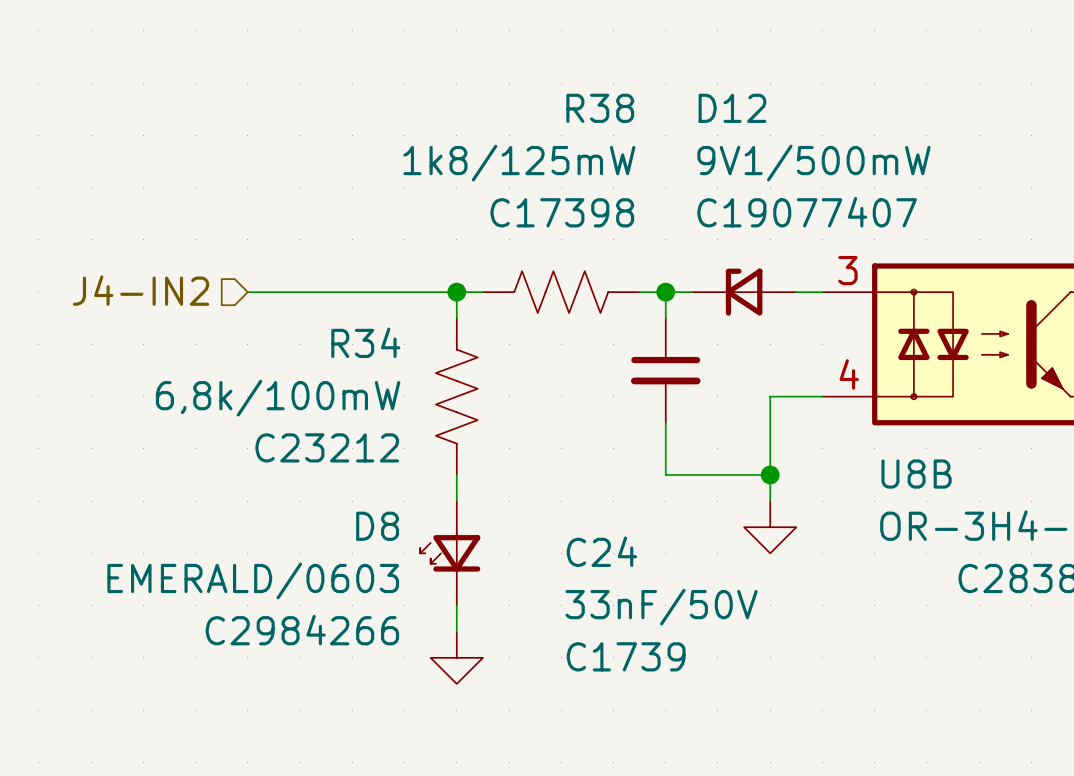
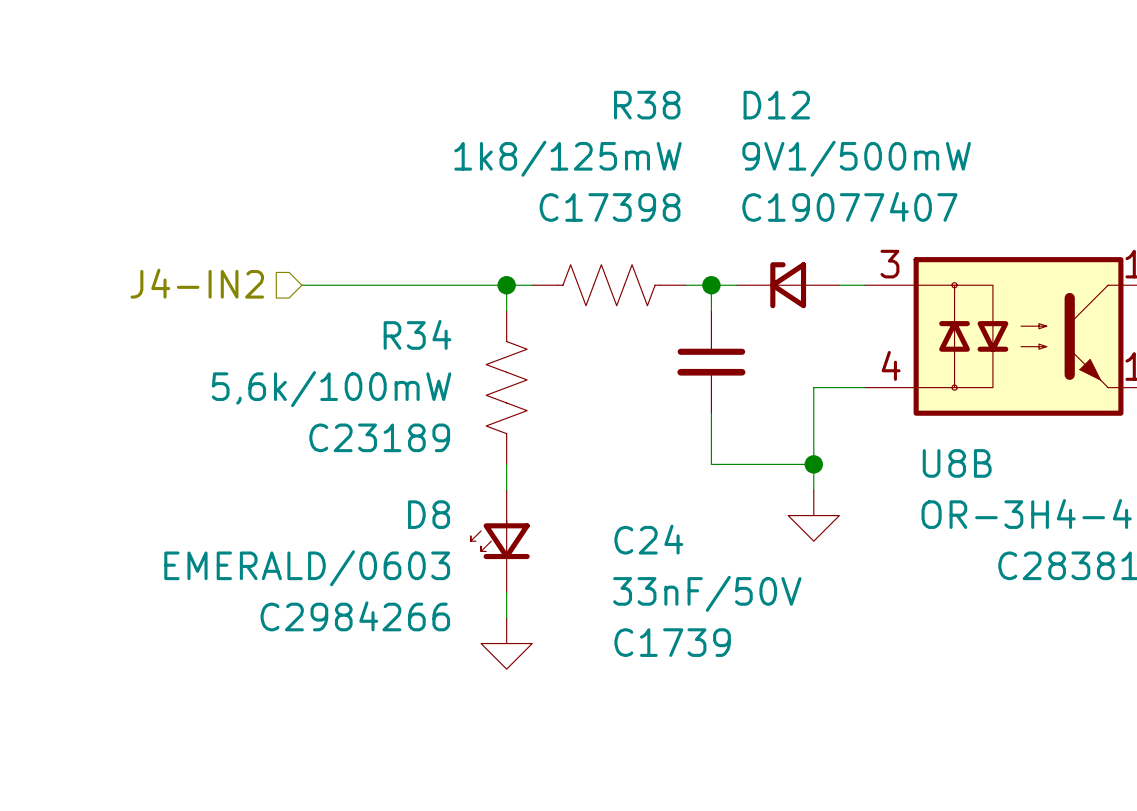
R34 value: 6,8k/100mW (278, 398) -> 5,6k/100mW (331, 389)
R34 text: C23212 (327, 447) -> C23189 (379, 437)

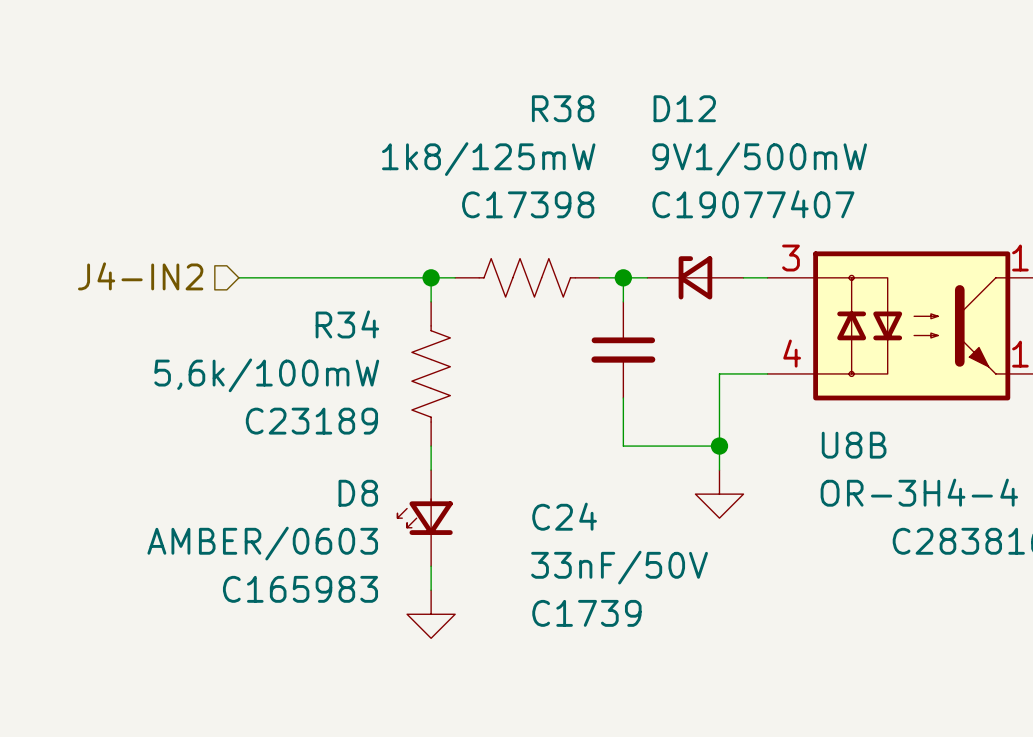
D8 value: EMERALD/0603 (307, 568) -> AMBER/0603 (262, 543)
D8 text: C2984266 (355, 616) -> C165983 (300, 589)

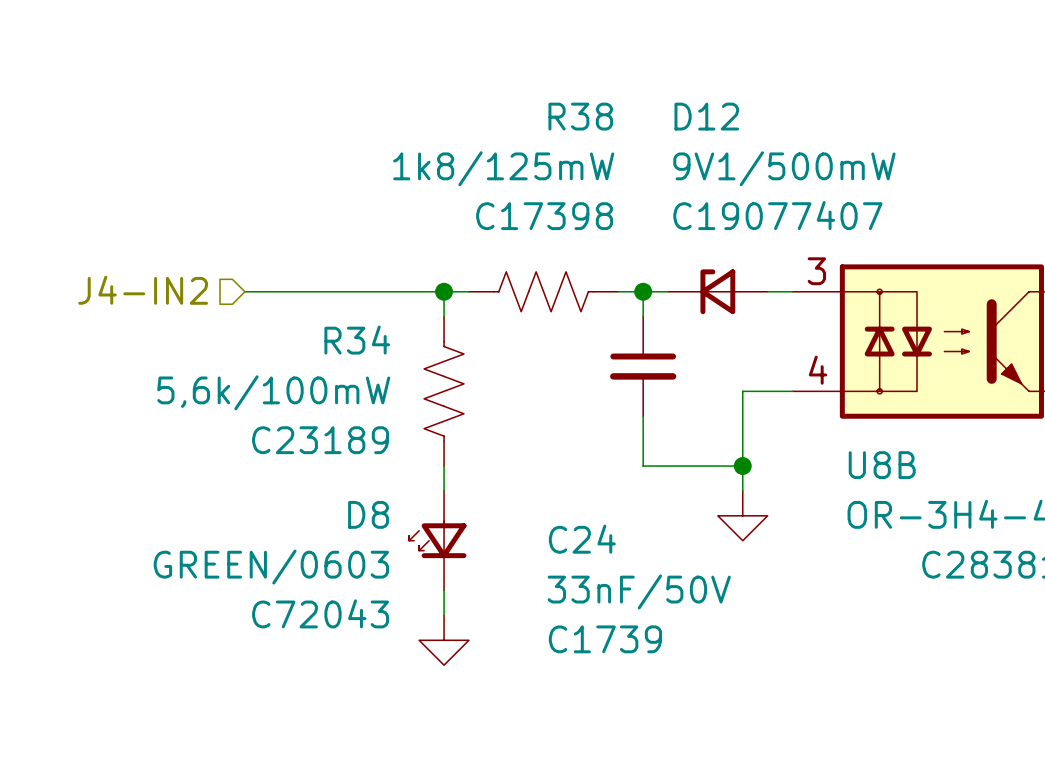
D8 value: AMBER/0603 (262, 543) -> GREEN/0603 (271, 567)
D8 text: C165983 (300, 589) -> C72043 (320, 613)

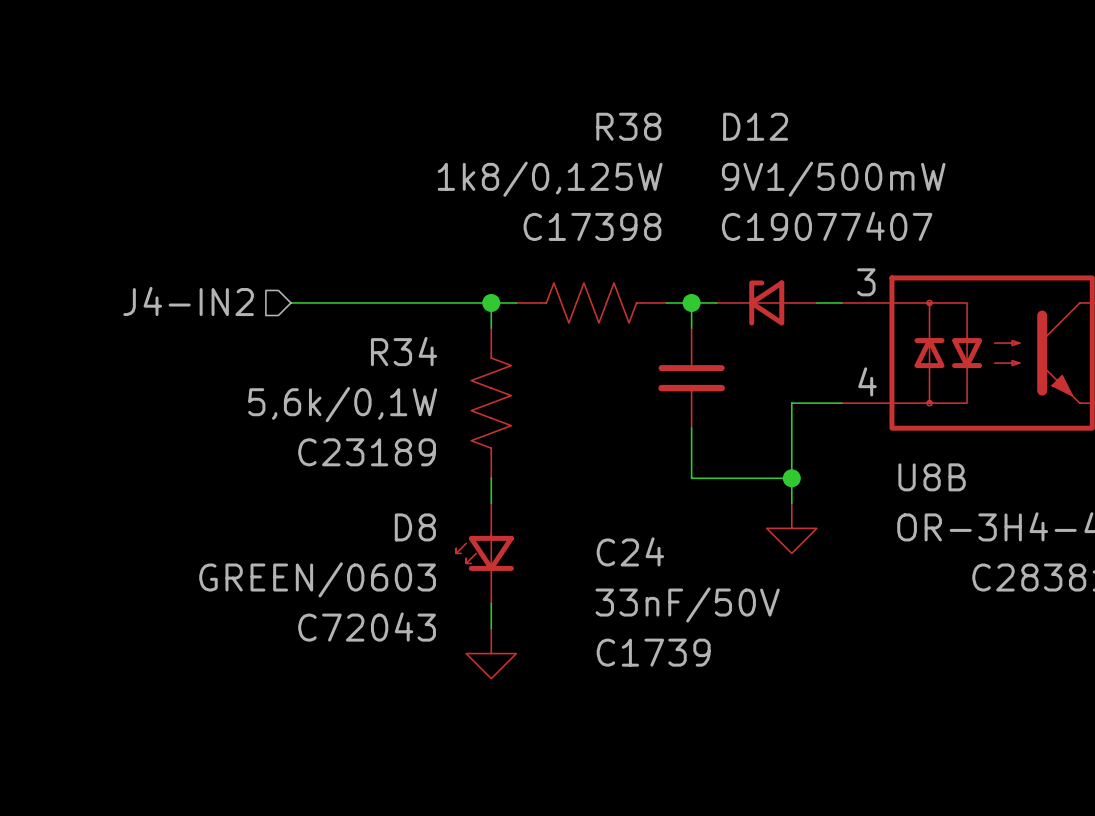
R38 value: 1k8/125mW (503, 168) -> 1k8/0,125W (550, 179)
R34 value: 5,6k/100mW (273, 392) -> 5,6k/0,1W (342, 404)

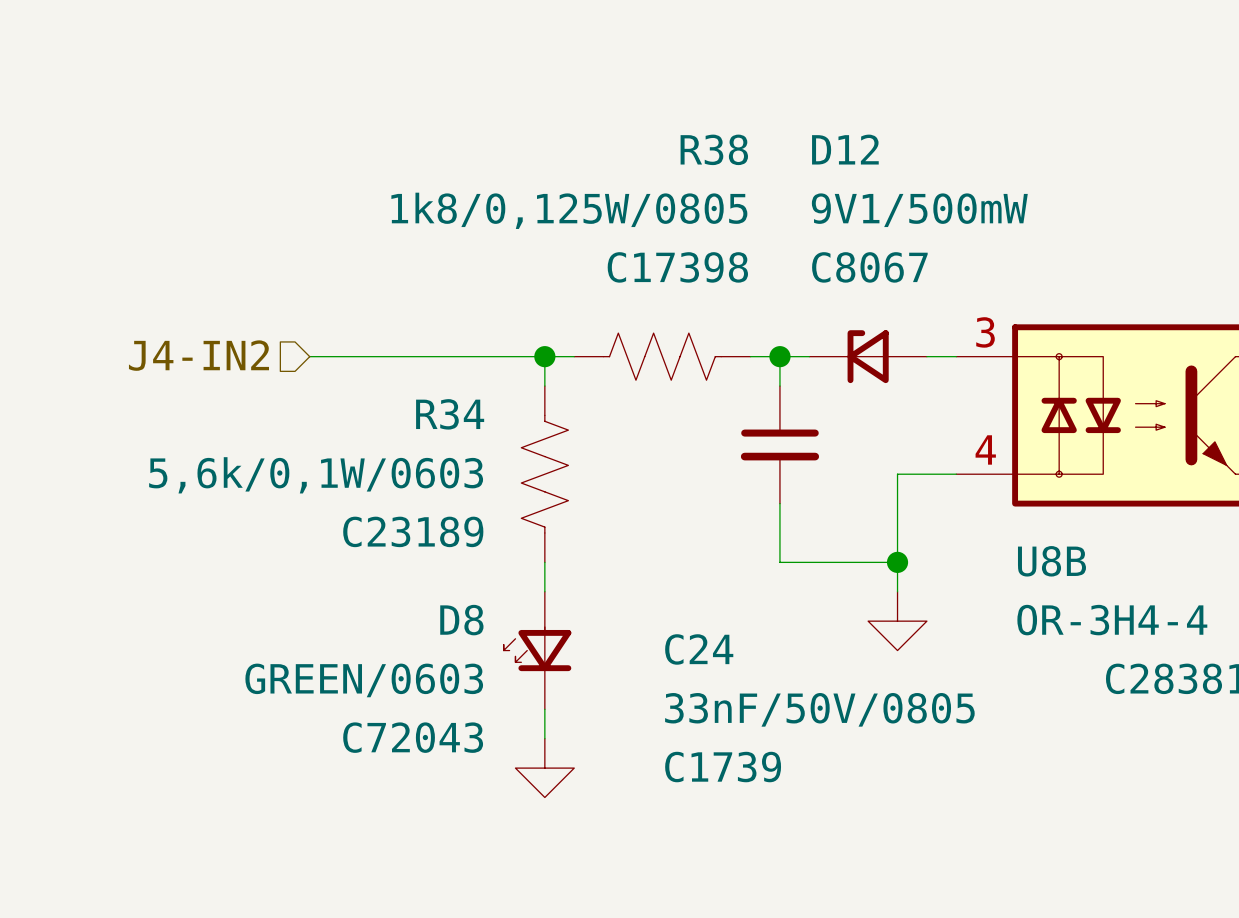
R38 value: 1k8/0,125W (550, 179) -> 1k8/0,125W/0805 (569, 210)
D12 text: C19077407 (827, 226) -> C8067 (869, 267)
R34 value: 5,6k/0,1W (342, 404) -> 5,6k/0,1W/0603 (316, 475)
C24 value: 33nF/50V (687, 604) -> 33nF/50V/0805 (819, 709)

